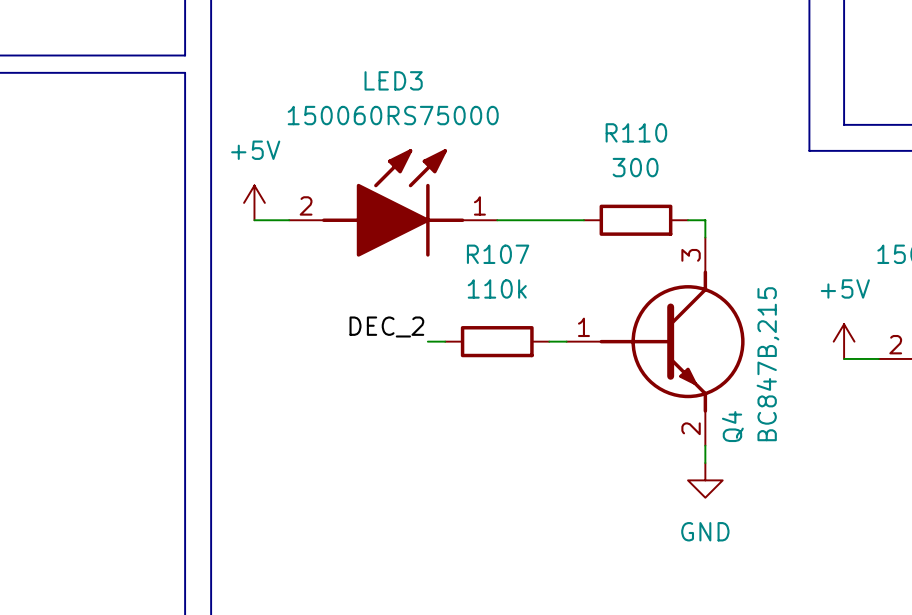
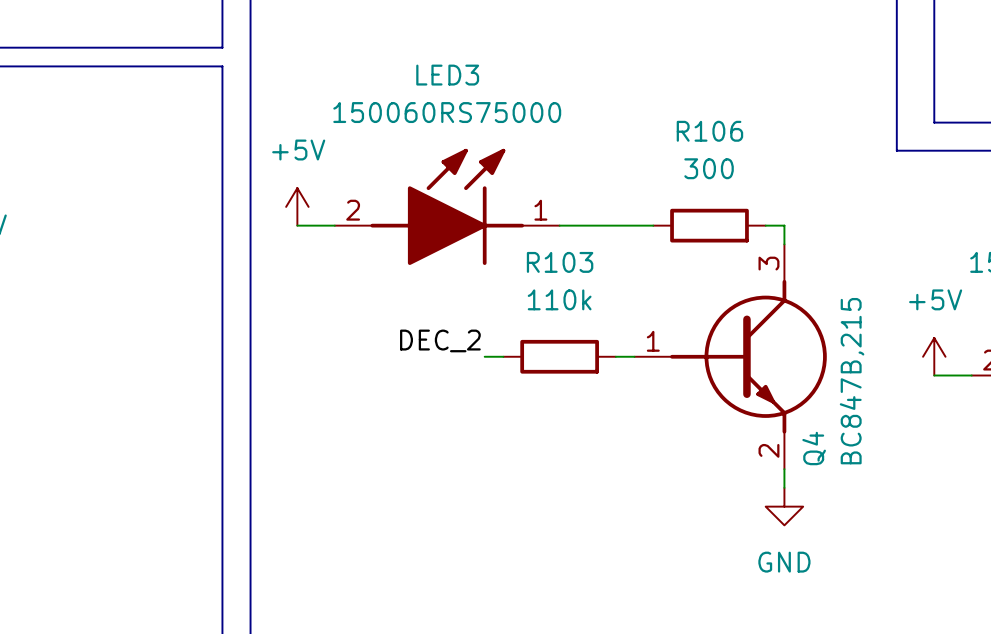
R110 name: R110 (636, 132) -> R106 (709, 131)
R107 name: R107 (498, 254) -> R103 (560, 262)

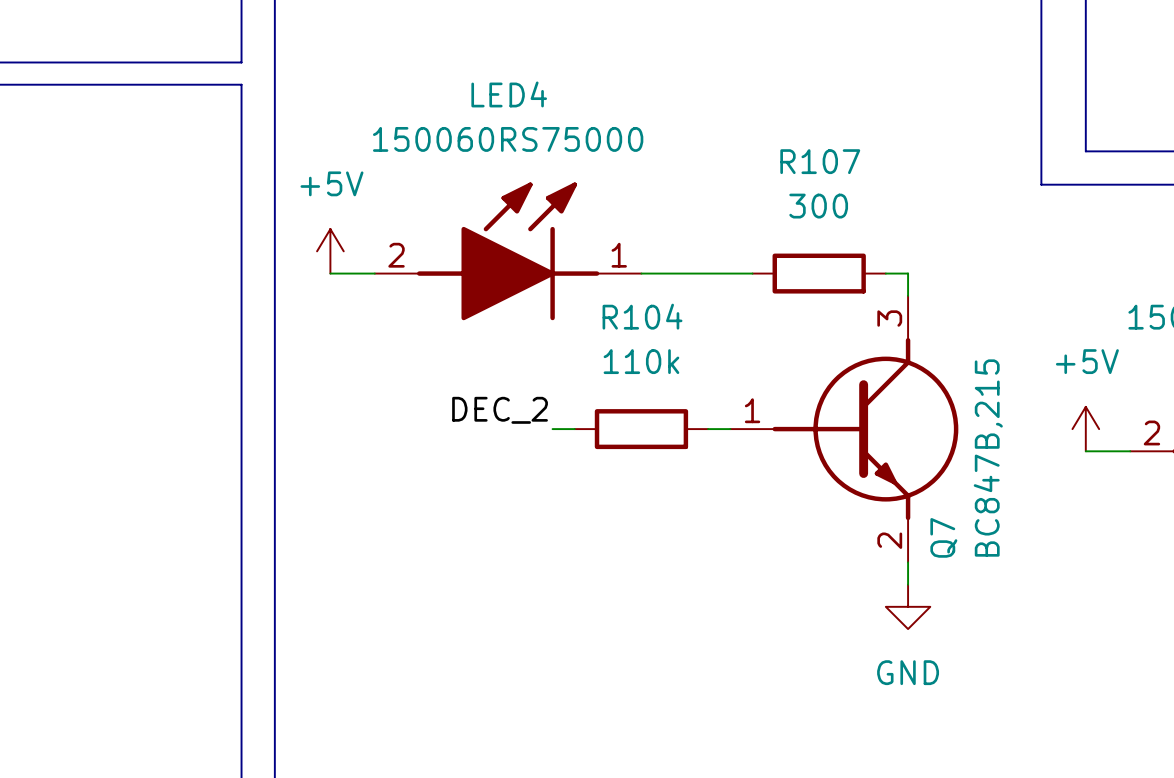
LED3 name: LED3 (447, 75) -> LED4 (509, 94)
R106 name: R106 (709, 131) -> R107 (820, 161)
R103 name: R103 (560, 262) -> R104 (642, 316)
Q4 name: Q4 (814, 448) -> Q7 (943, 537)

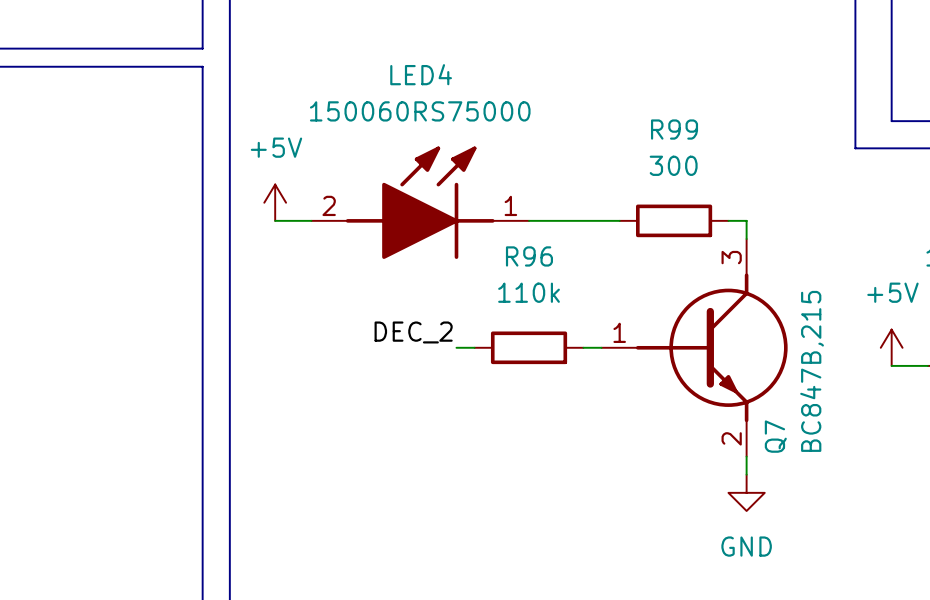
R107 name: R107 (820, 161) -> R99 (674, 129)
R104 name: R104 (642, 316) -> R96 (529, 256)

